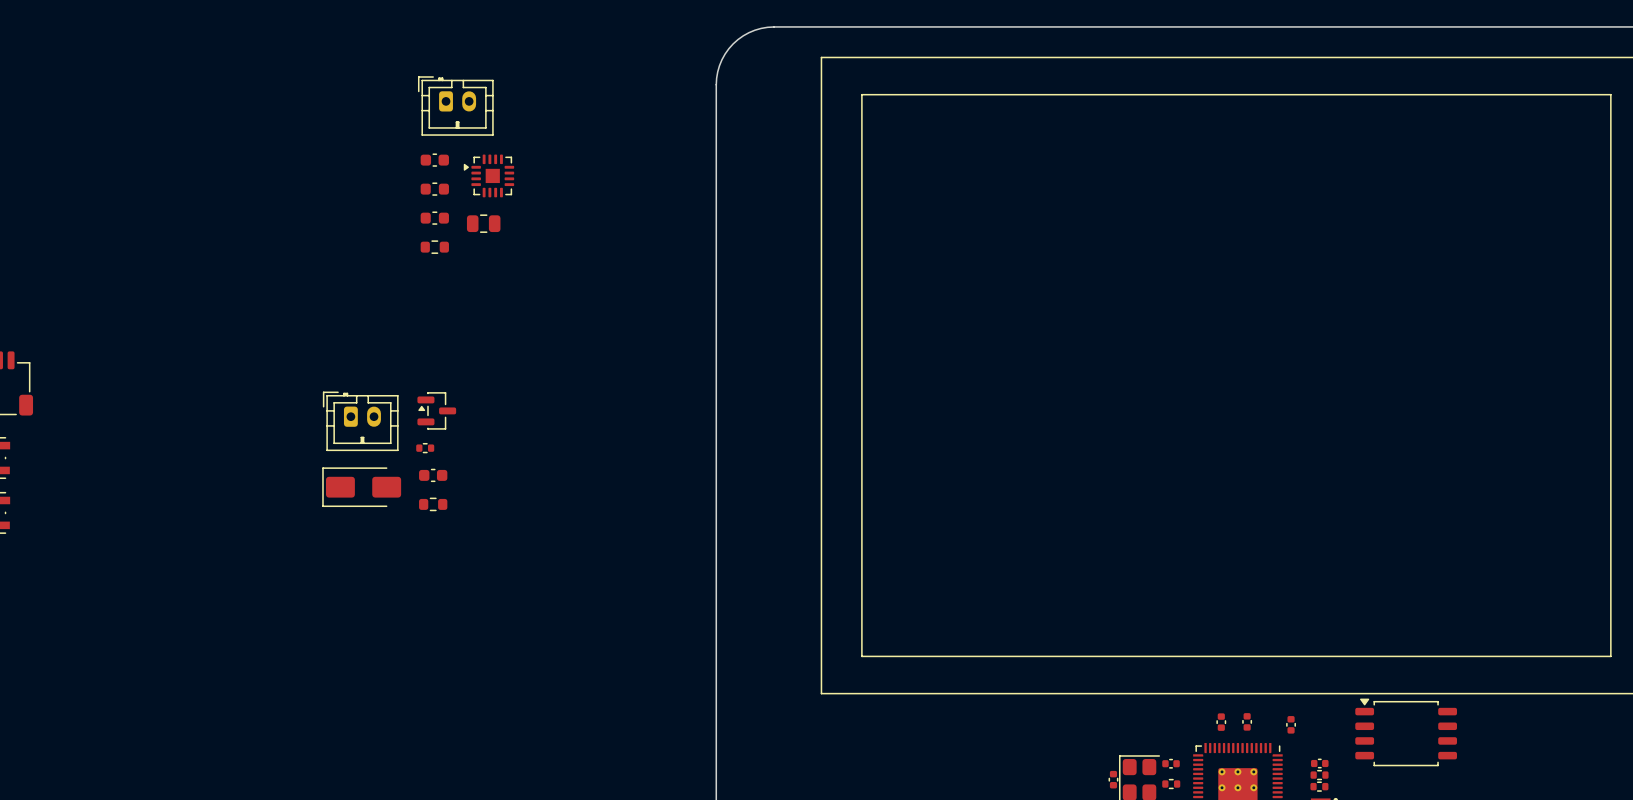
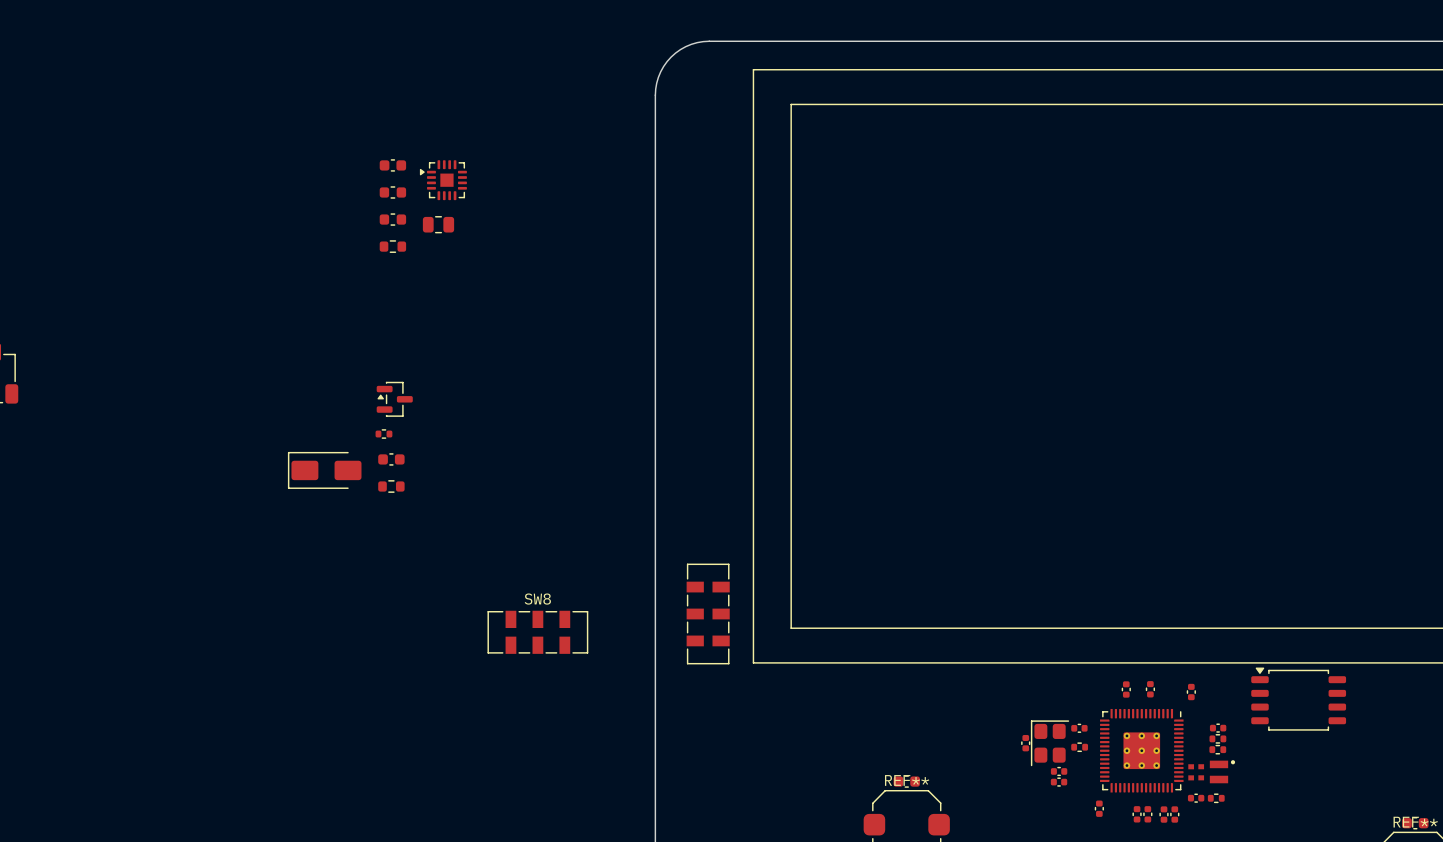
part: (455, 106) -> none
part: (360, 421) -> none
part: none -> (708, 613)
SW8: none -> (537, 632)

